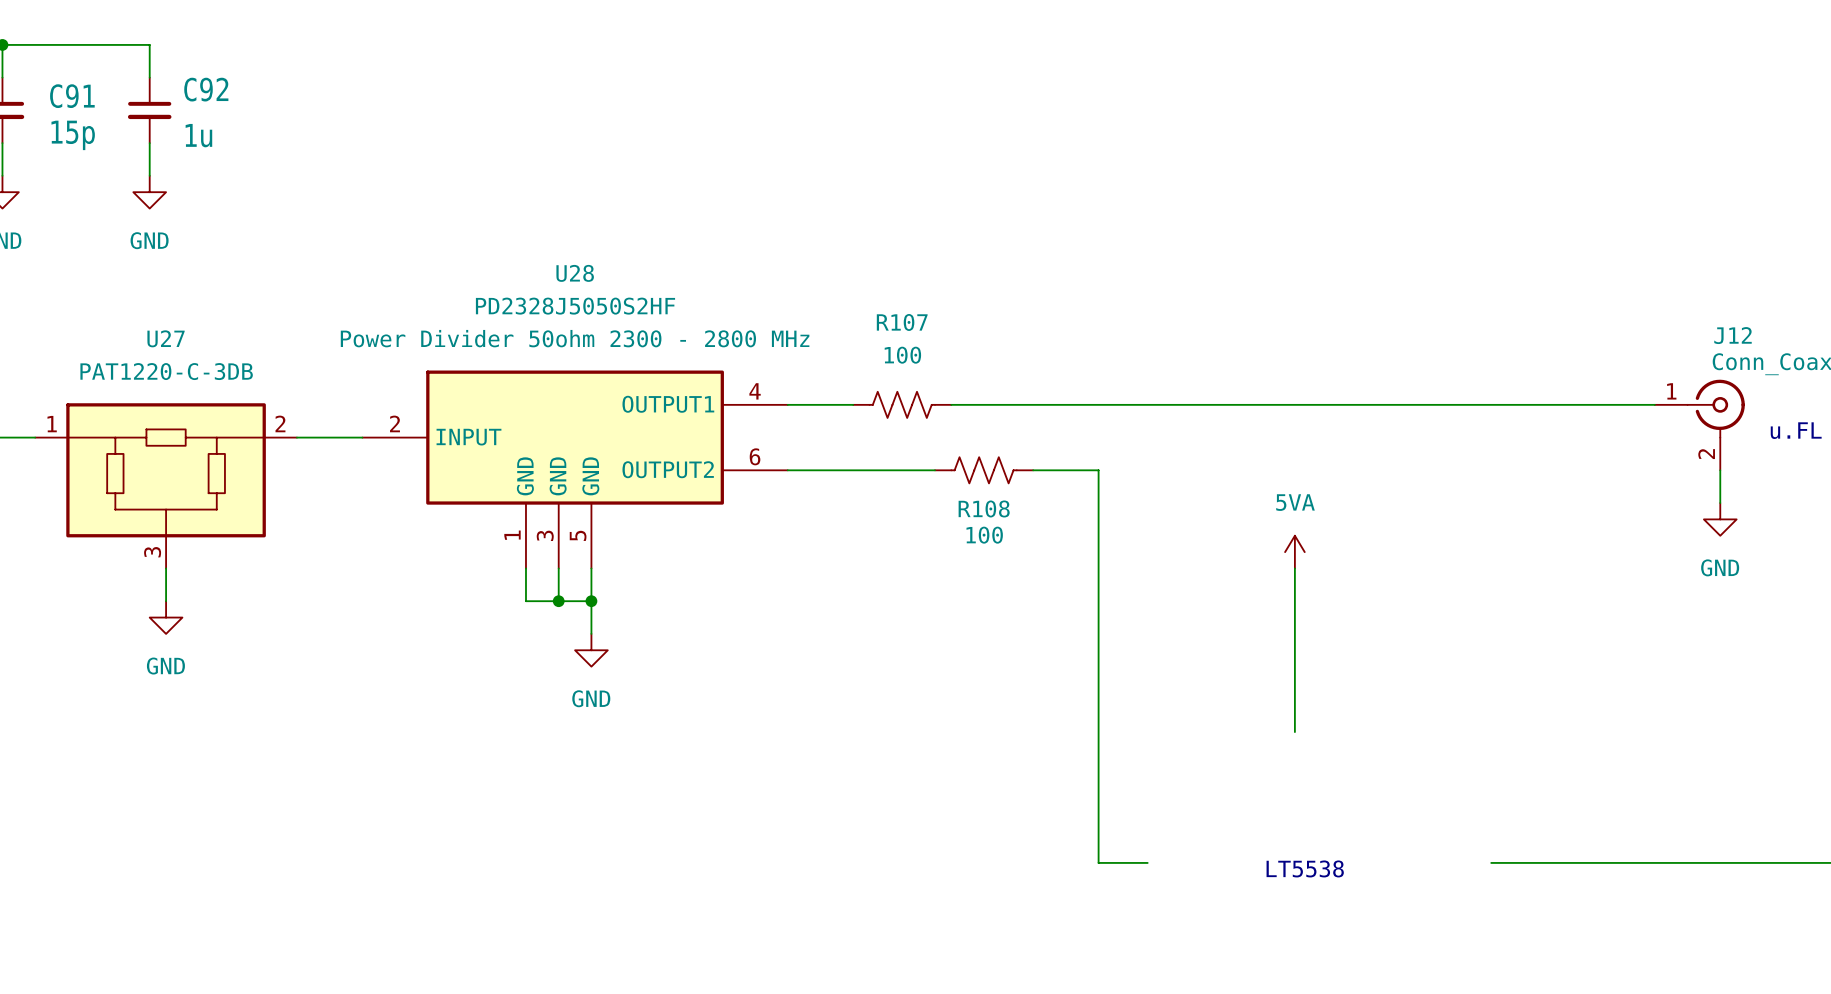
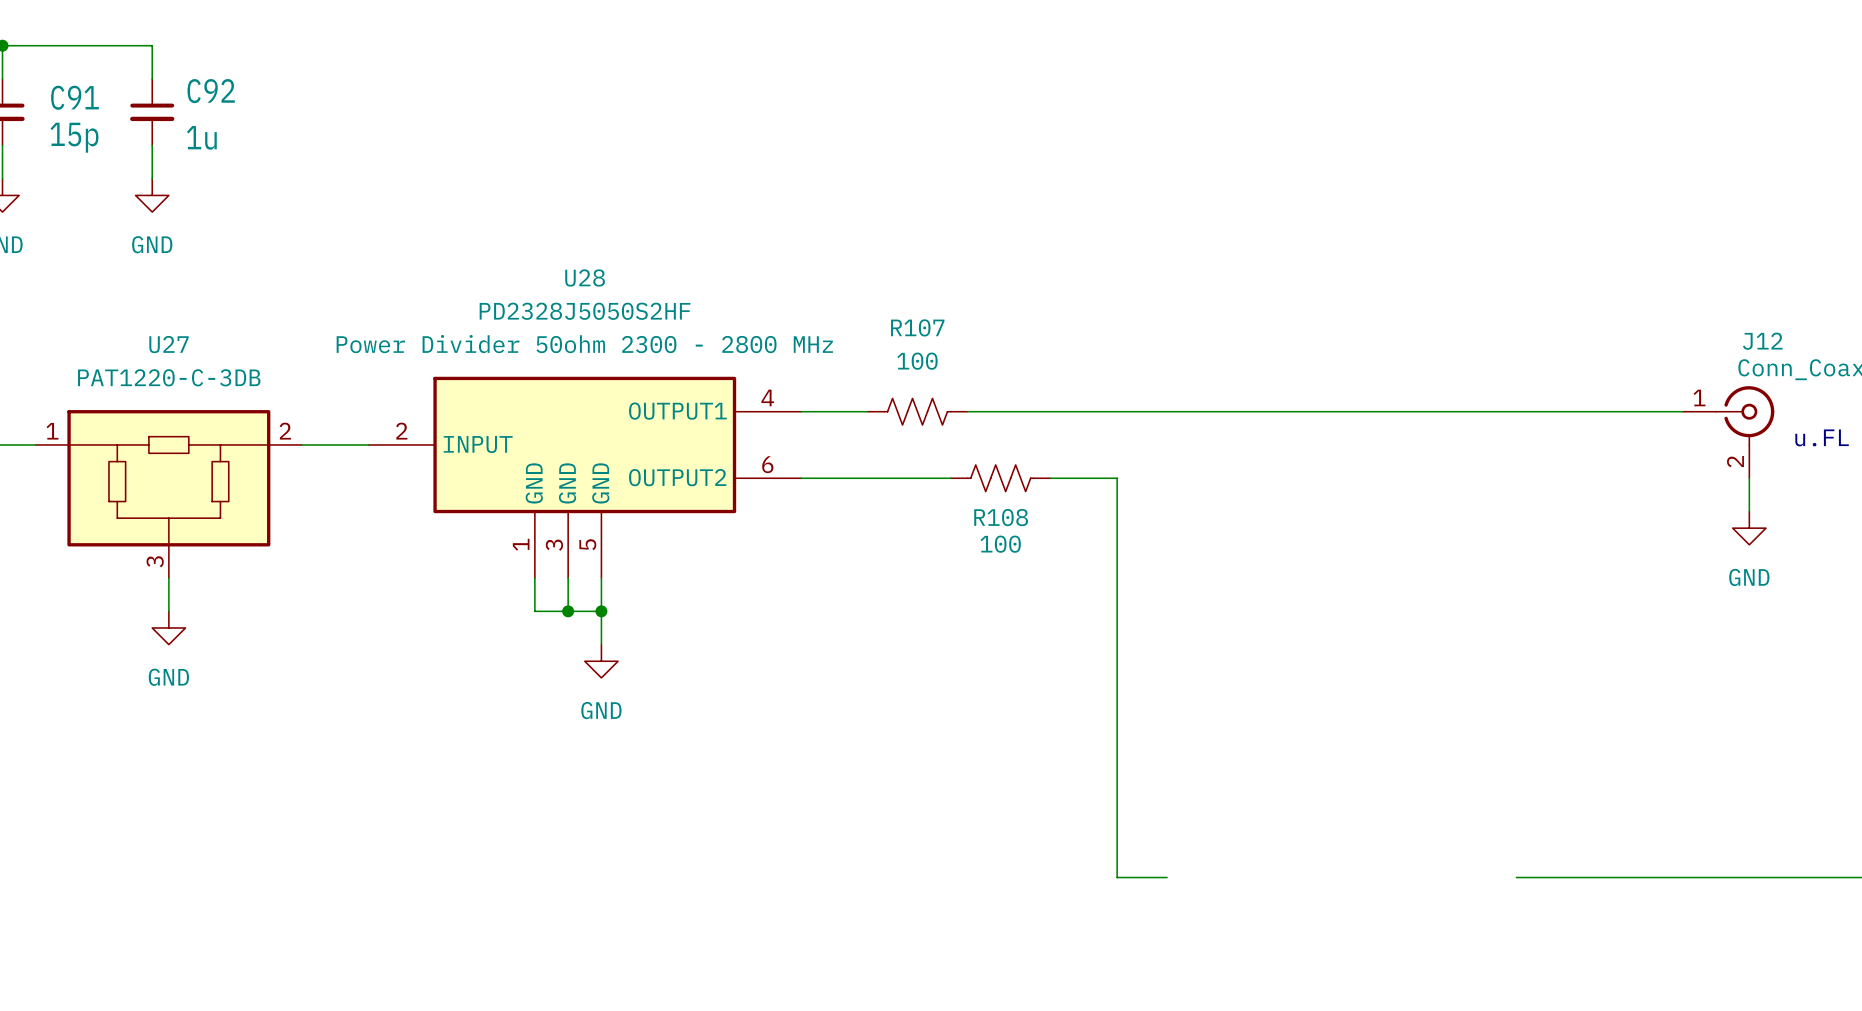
power symbol: 5VA (1294, 552) -> none
wire: (1294, 568) (1294, 732) -> none
text: LT5538 (1305, 868) -> none

